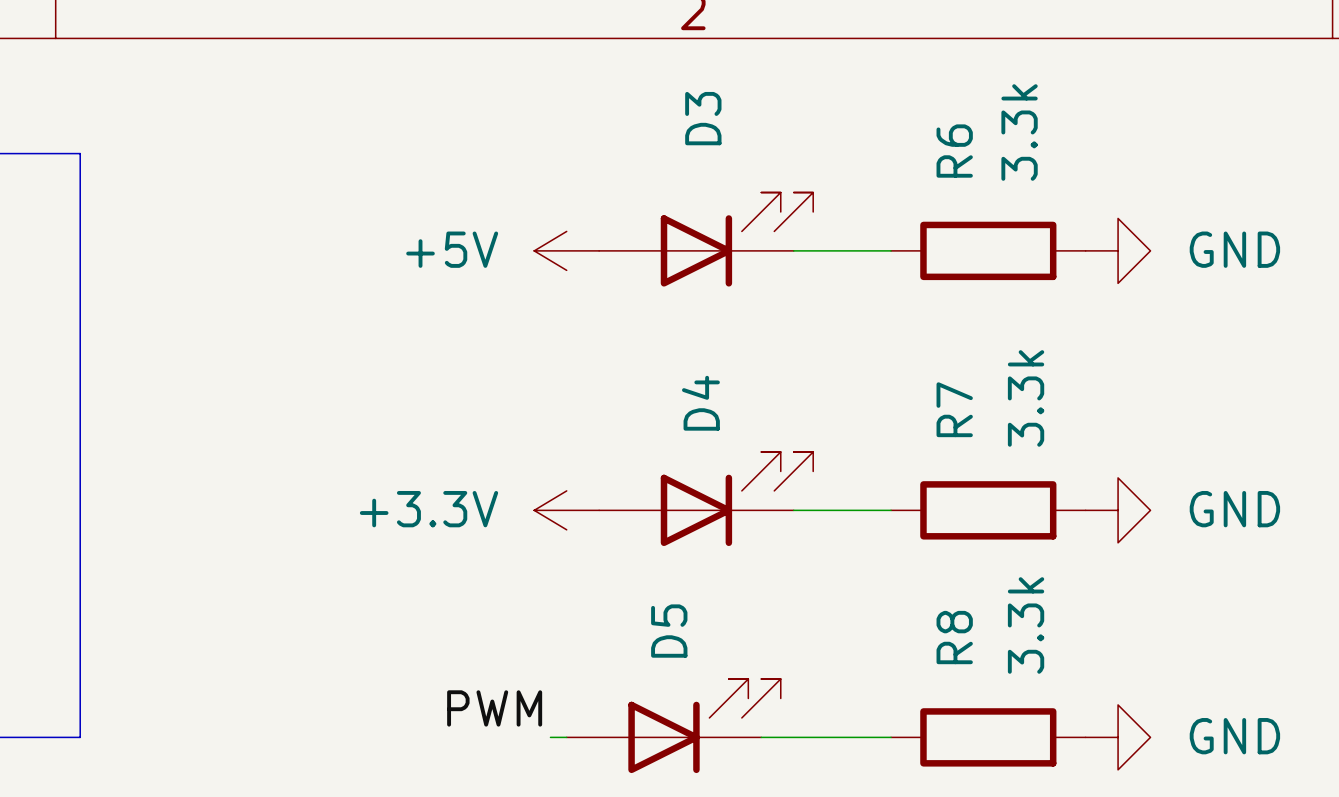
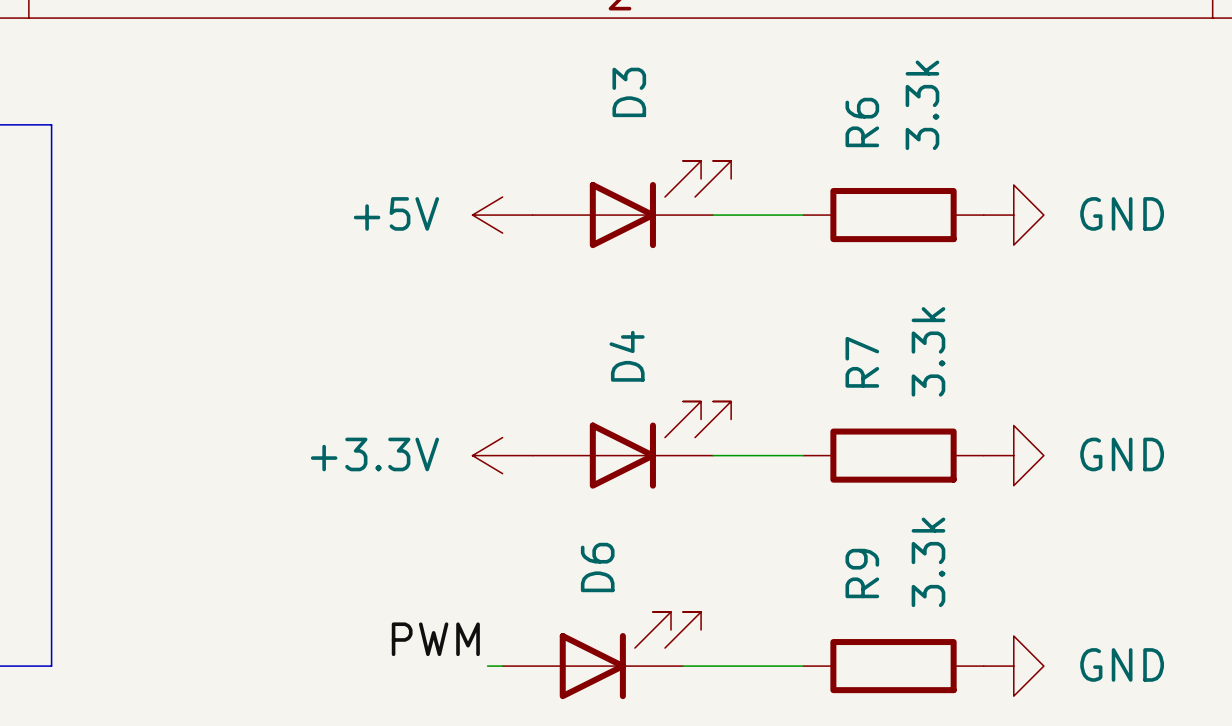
D5 name: D5 (669, 631) -> D6 (597, 567)
R8 name: R8 (954, 637) -> R9 (862, 573)

